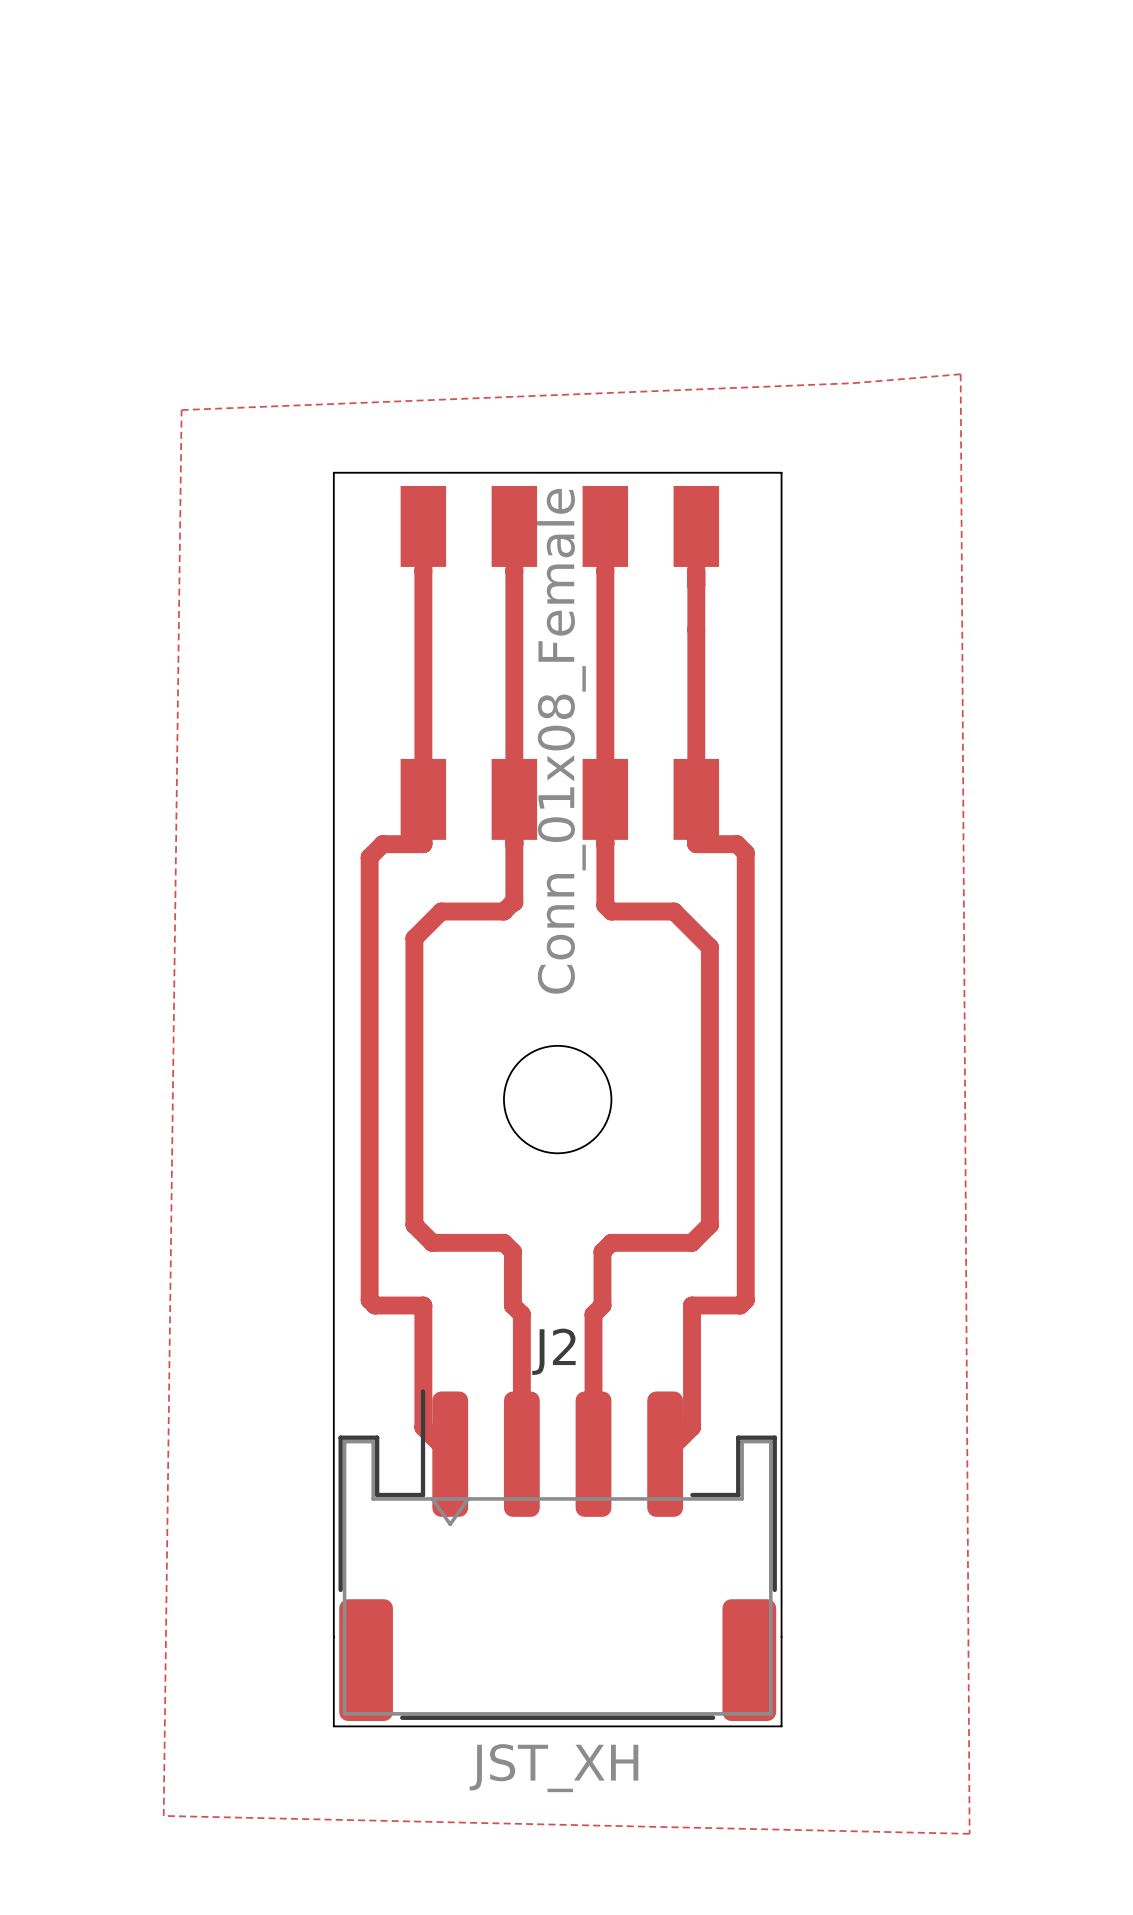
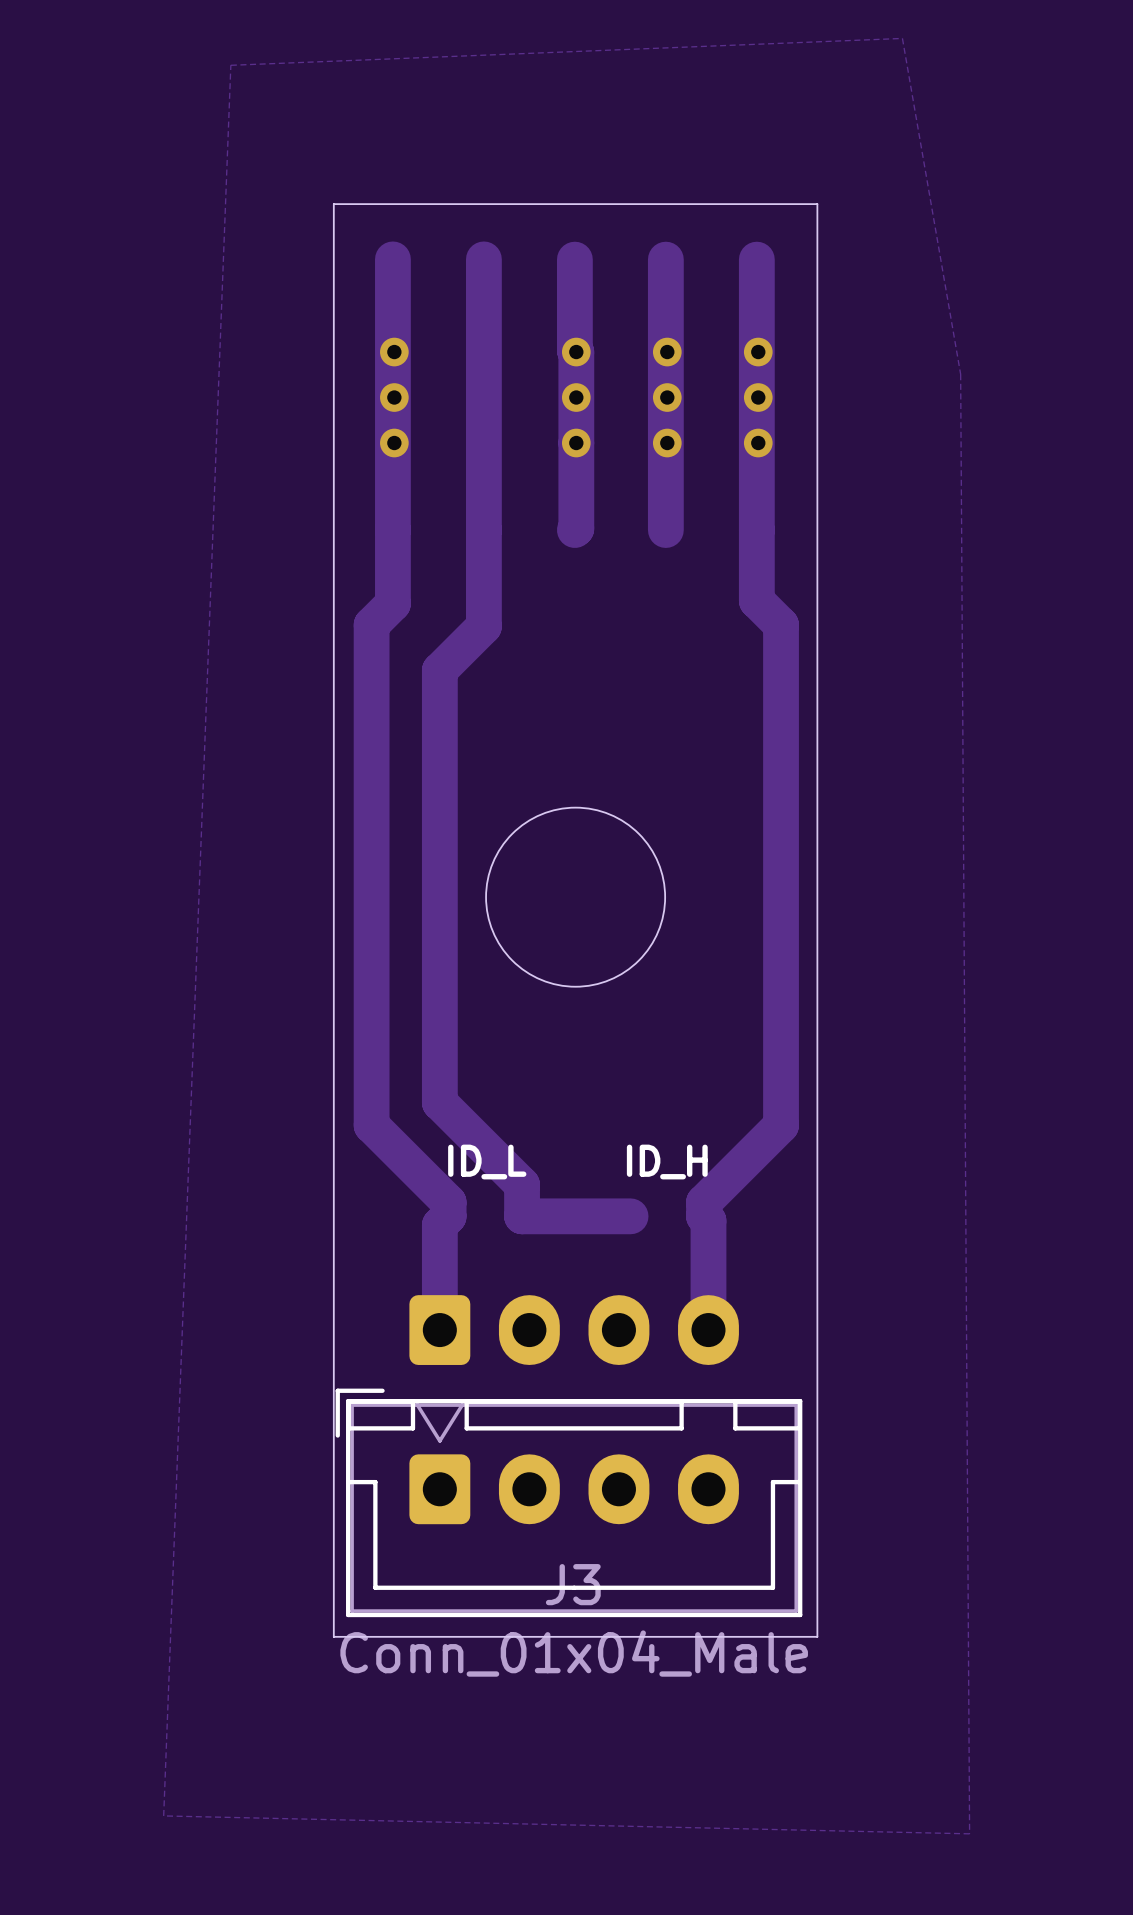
track: none -> (392, 259) (392, 603) (371, 624) (371, 1125) (448, 1202) (448, 1216) (439, 1225) (439, 1330)
track: none -> (483, 259) (483, 626) (439, 670) (439, 1102) (522, 1184) (522, 1216) (630, 1216)
track: none -> (574, 259) (574, 530)
track: none -> (665, 259) (665, 530)
track: none -> (756, 259) (756, 600) (781, 624) (781, 1125) (704, 1202) (704, 1216) (708, 1220) (708, 1330)
via: none -> (394, 352)
via: none -> (576, 352)
via: none -> (667, 352)
via: none -> (758, 352)
zone outline: (960, 374) (853, 383) (181, 410) (163, 1815) -> (960, 374) (902, 38) (230, 65) (163, 1815)
via: none -> (394, 397)
via: none -> (576, 397)
via: none -> (667, 397)
via: none -> (758, 397)
via: none -> (394, 443)
via: none -> (576, 443)
via: none -> (667, 443)
via: none -> (758, 443)
board edge: (333, 472) (781, 472) (781, 1726) (333, 1726) (333, 1636) -> (333, 472) (333, 204) (817, 204) (817, 1636) (333, 1636)
track: (423, 526) (423, 844) (382, 844) (369, 857) (369, 1300) (375, 1305) (423, 1305) (423, 1427) (450, 1454) -> none
track: (514, 526) (514, 902) (503, 911) (441, 911) (414, 938) (414, 1224) (432, 1242) (503, 1242) (512, 1251) (512, 1305) (521, 1314) (521, 1454) -> none
track: (605, 526) (605, 905) (611, 911) (674, 911) (709, 947) (709, 1224) (692, 1242) (611, 1242) (602, 1251) (602, 1305) (593, 1314) (593, 1454) -> none
track: (696, 526) (696, 844) (736, 844) (745, 852) (745, 1300) (740, 1305) (692, 1305) (692, 1427) (665, 1454) -> none
part: Conn_01x08_Female (559, 662) -> none
round board edge: none -> [485, 806, 667, 988]
round board edge: [503, 1044, 613, 1155] -> none
text: none -> ID_L (487, 1162)
text: none -> ID_H (667, 1162)
part: none -> (574, 1330)
J3: none -> Conn_01x04_Male (568, 1502)
J2: JST_XH (557, 1555) -> none

